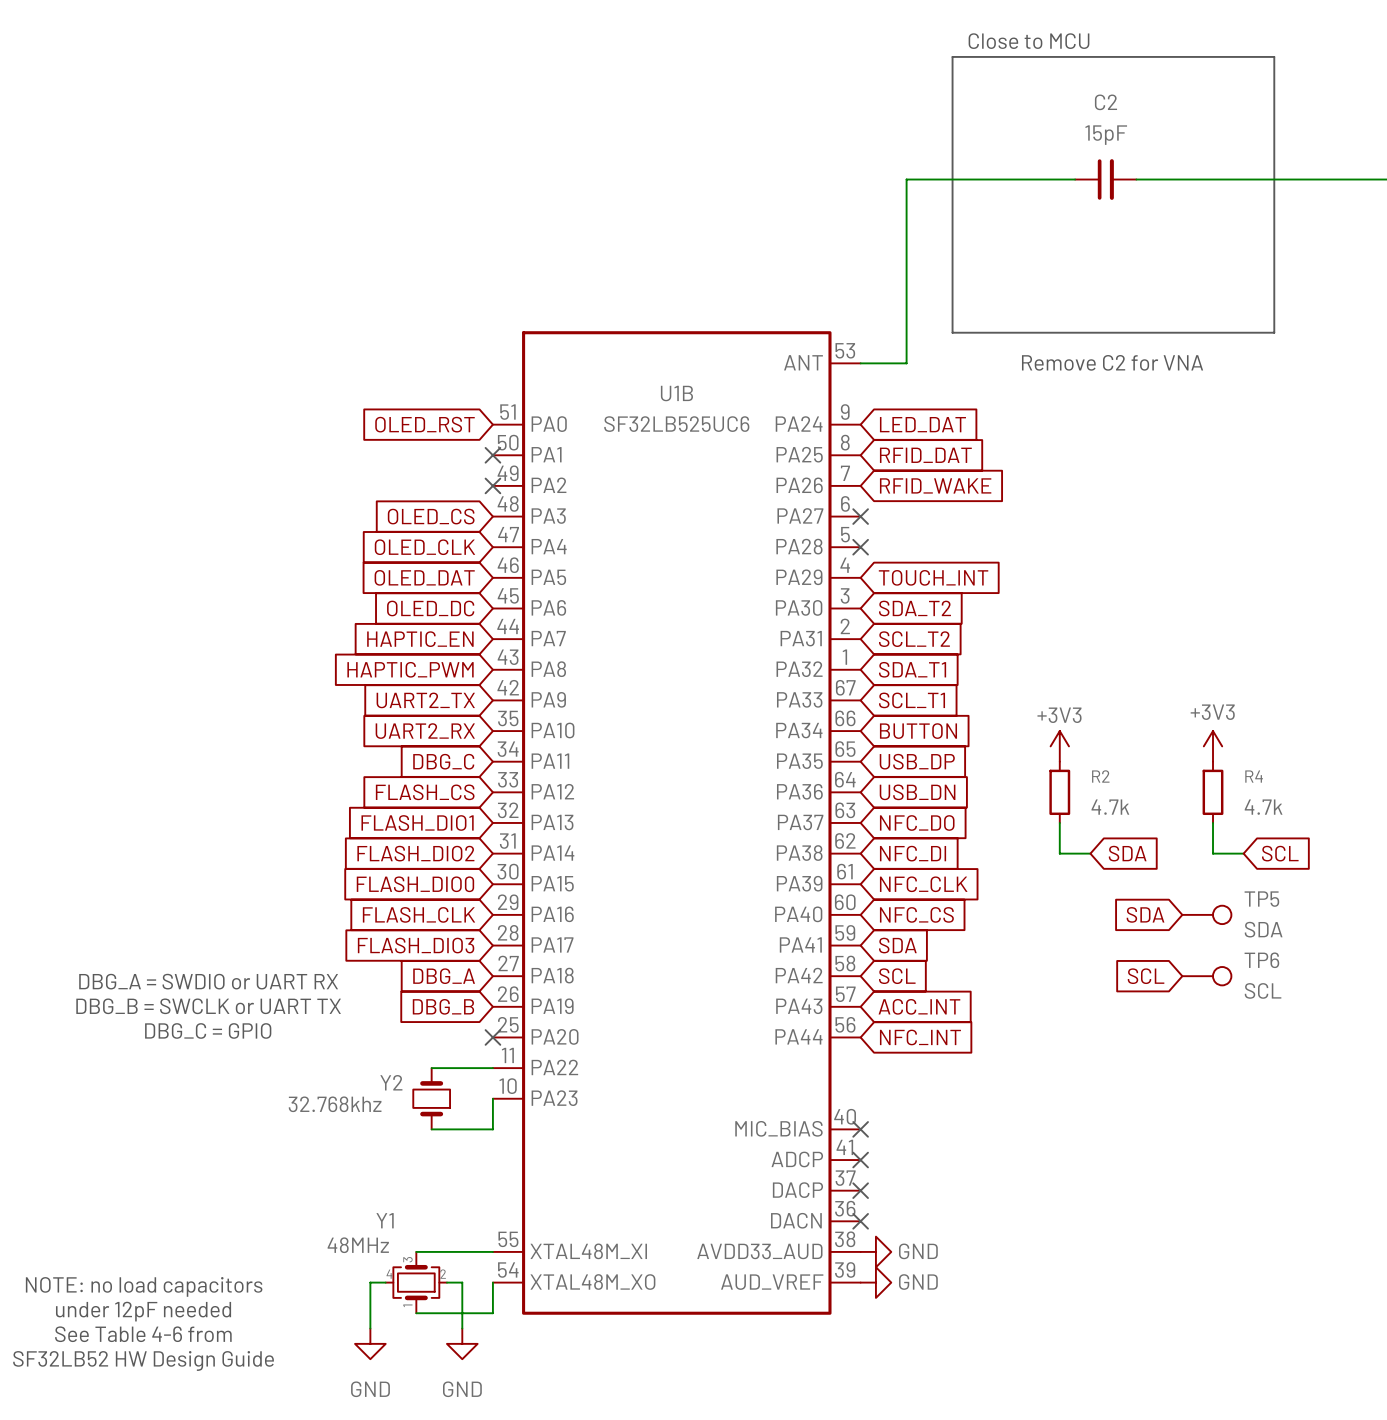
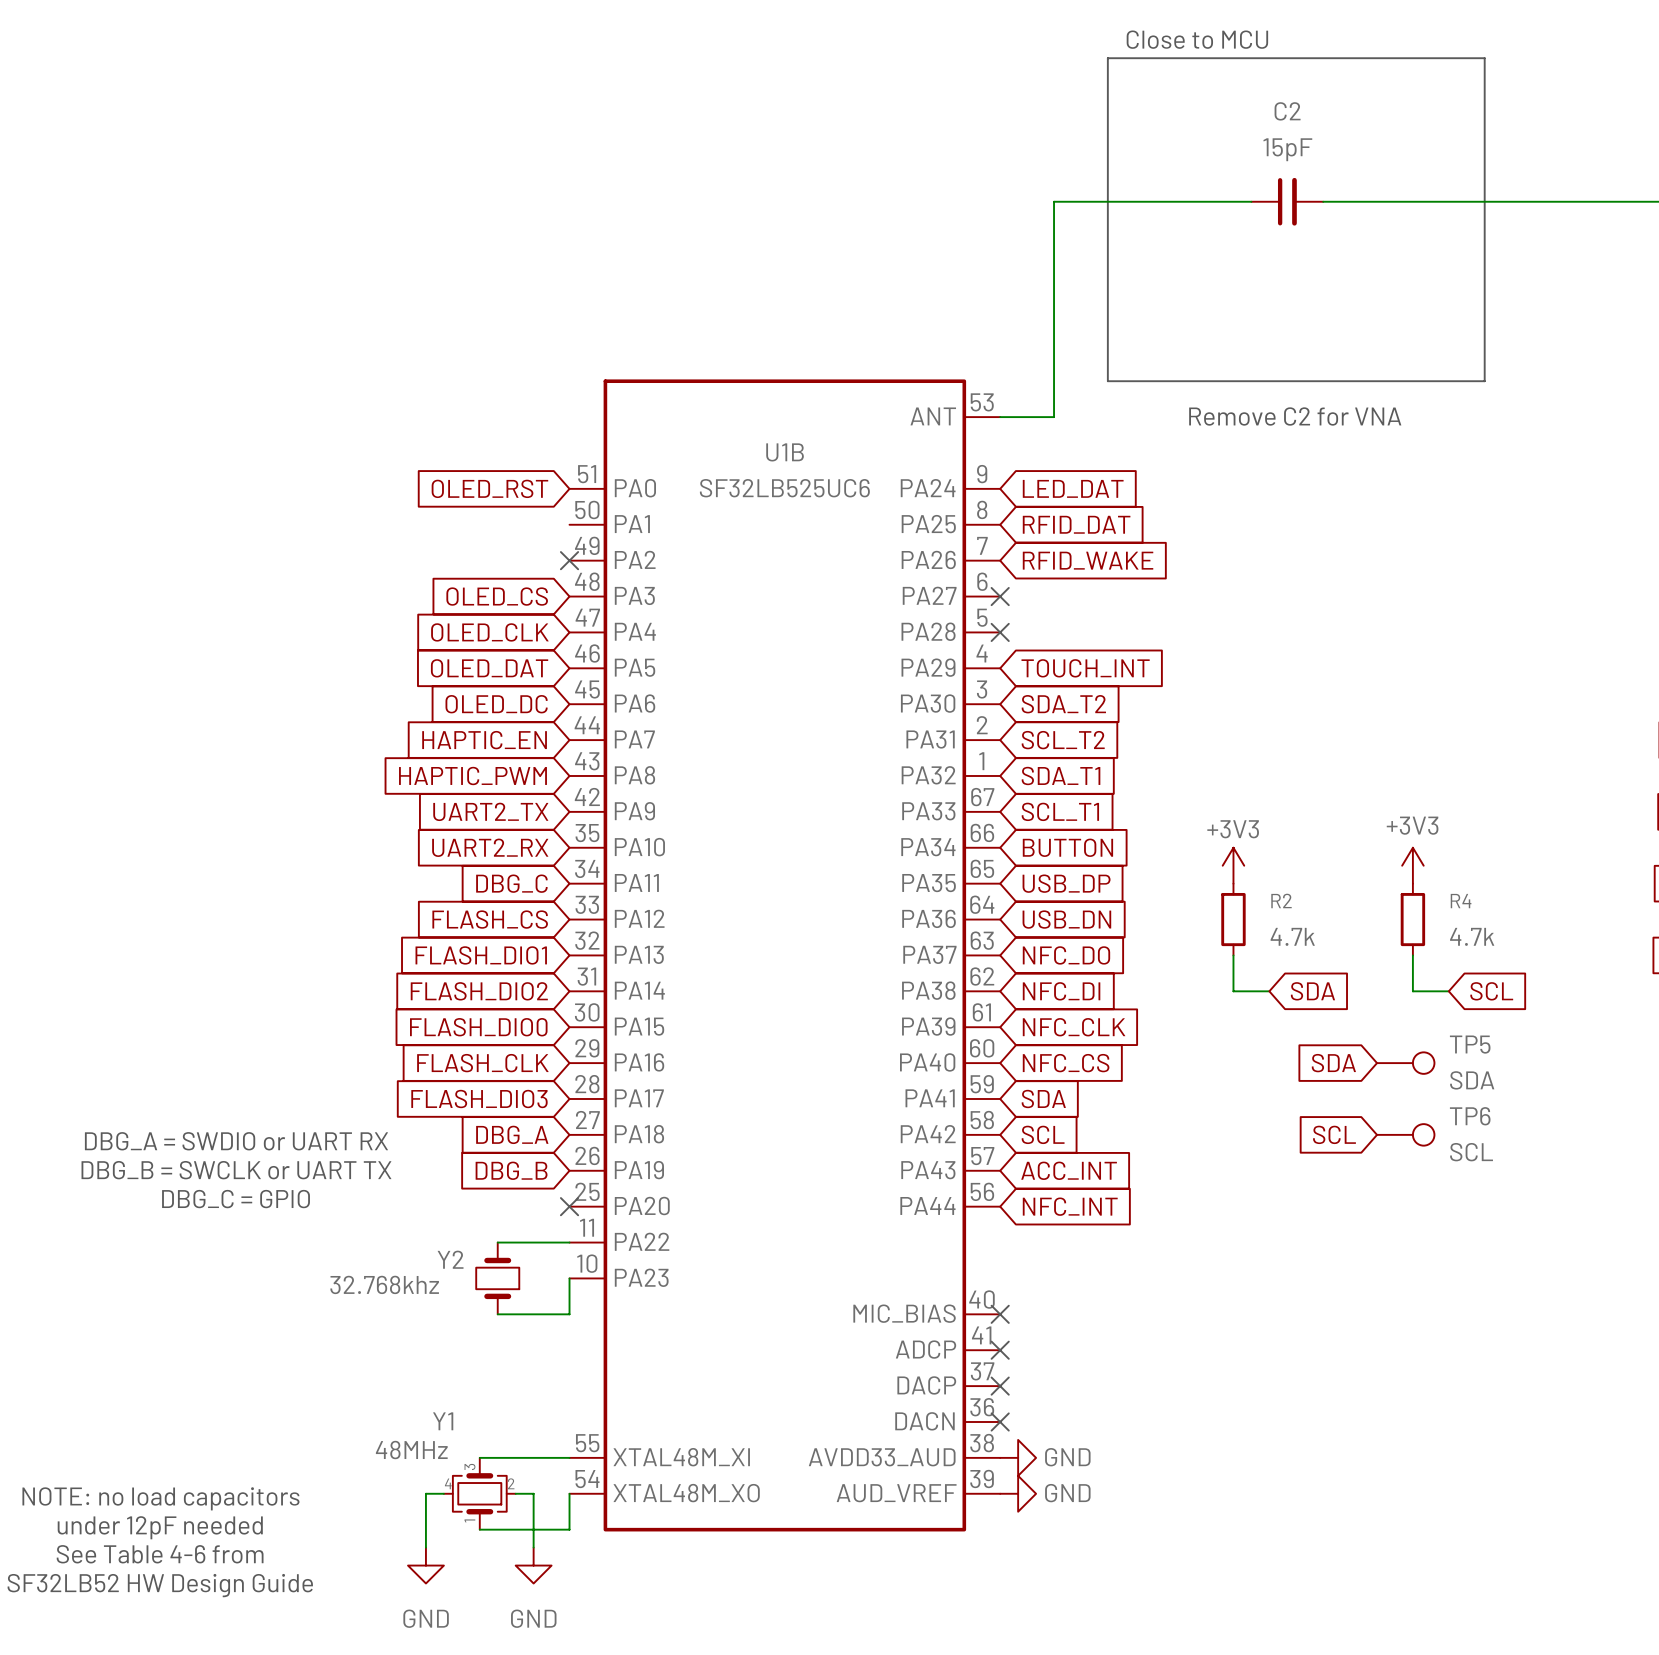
no-connect mark: (492, 455) -> none

